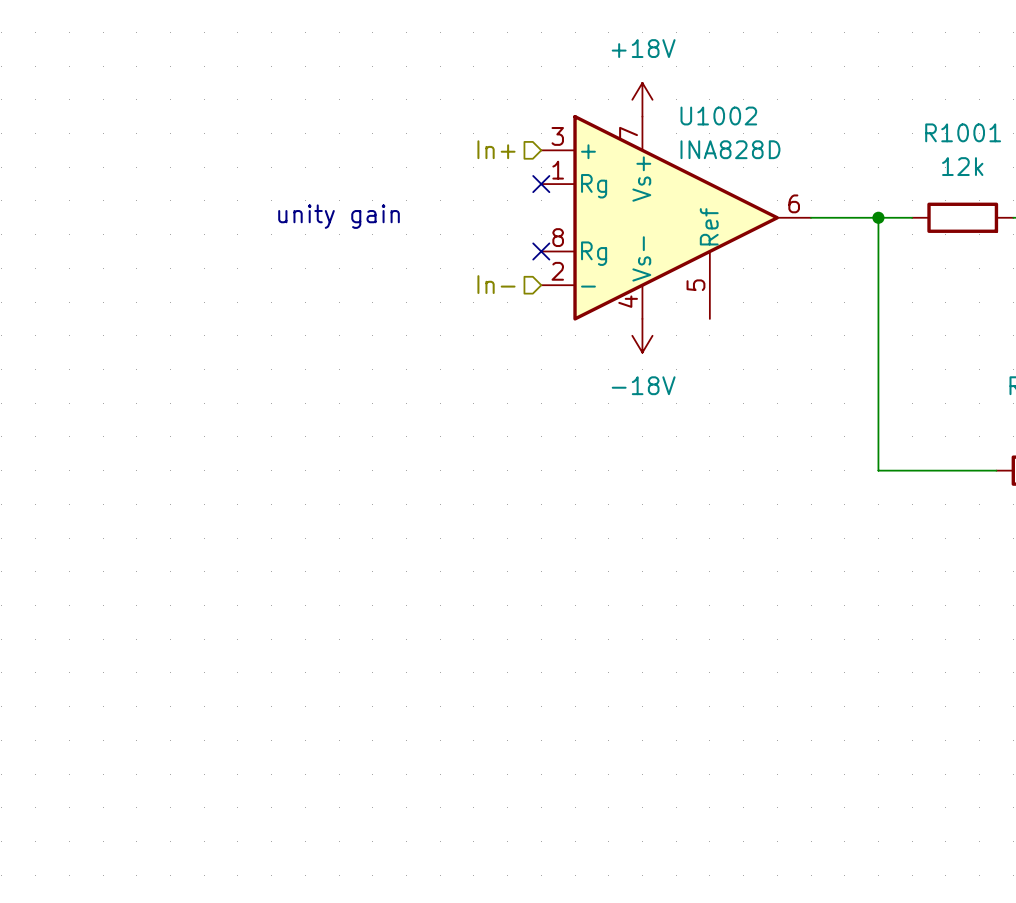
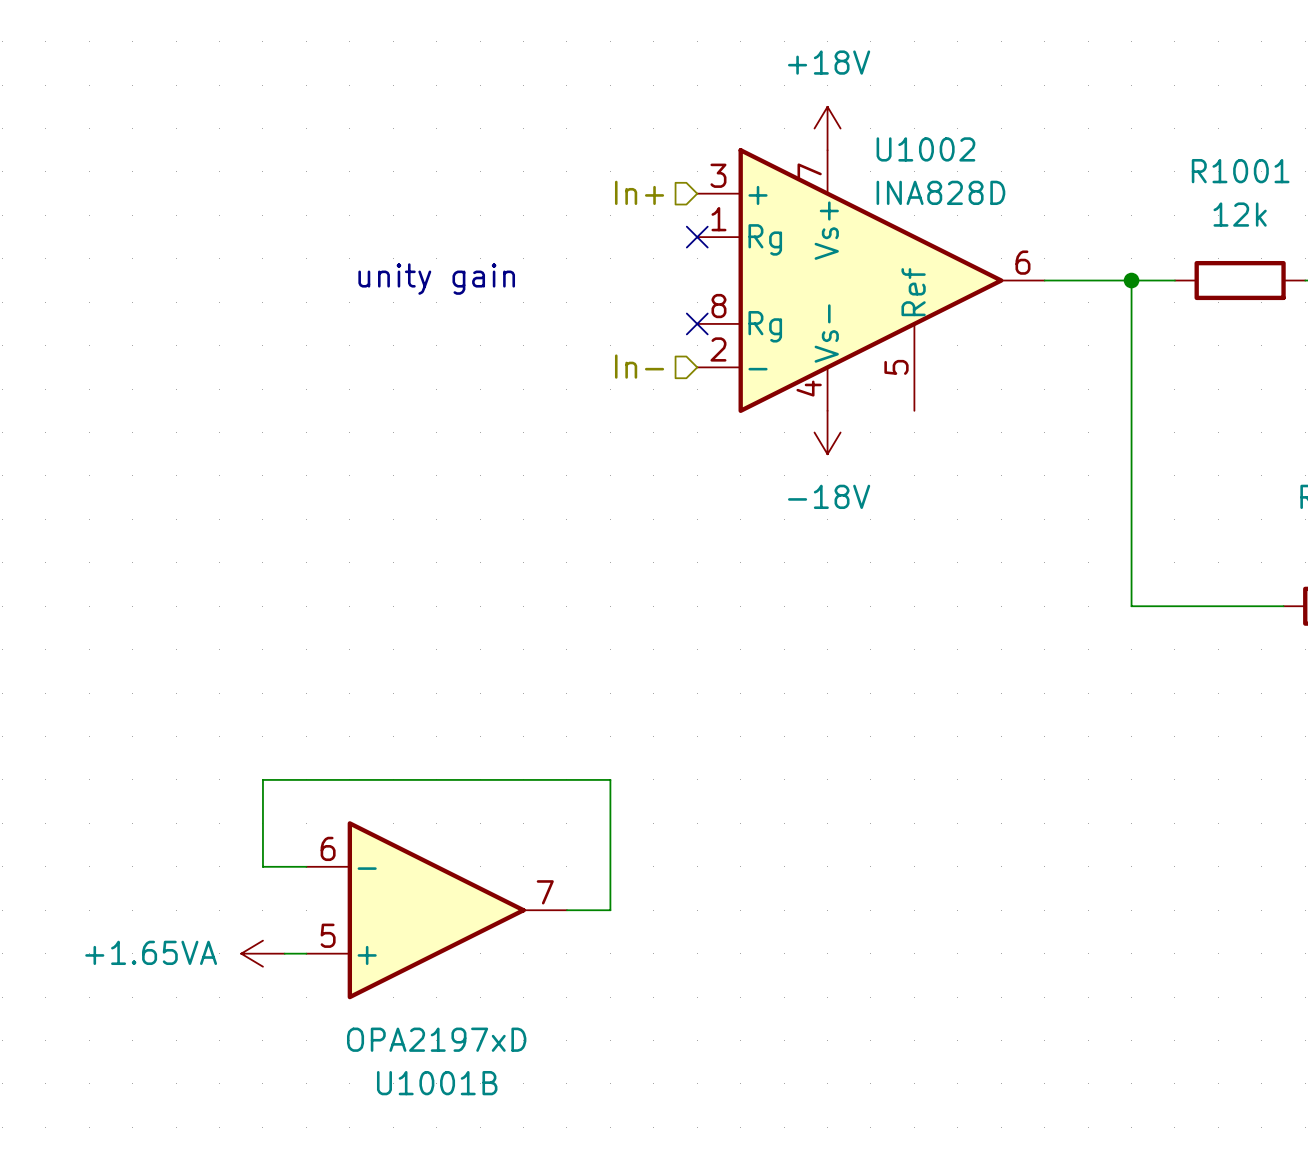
wire: none -> (306, 866) (262, 866) (262, 779) (610, 779) (610, 910) (566, 910)
U1001B: none -> OPA2197xD (436, 910)
power symbol: none -> +1.65VA (262, 953)
wire: none -> (284, 953) (306, 953)

